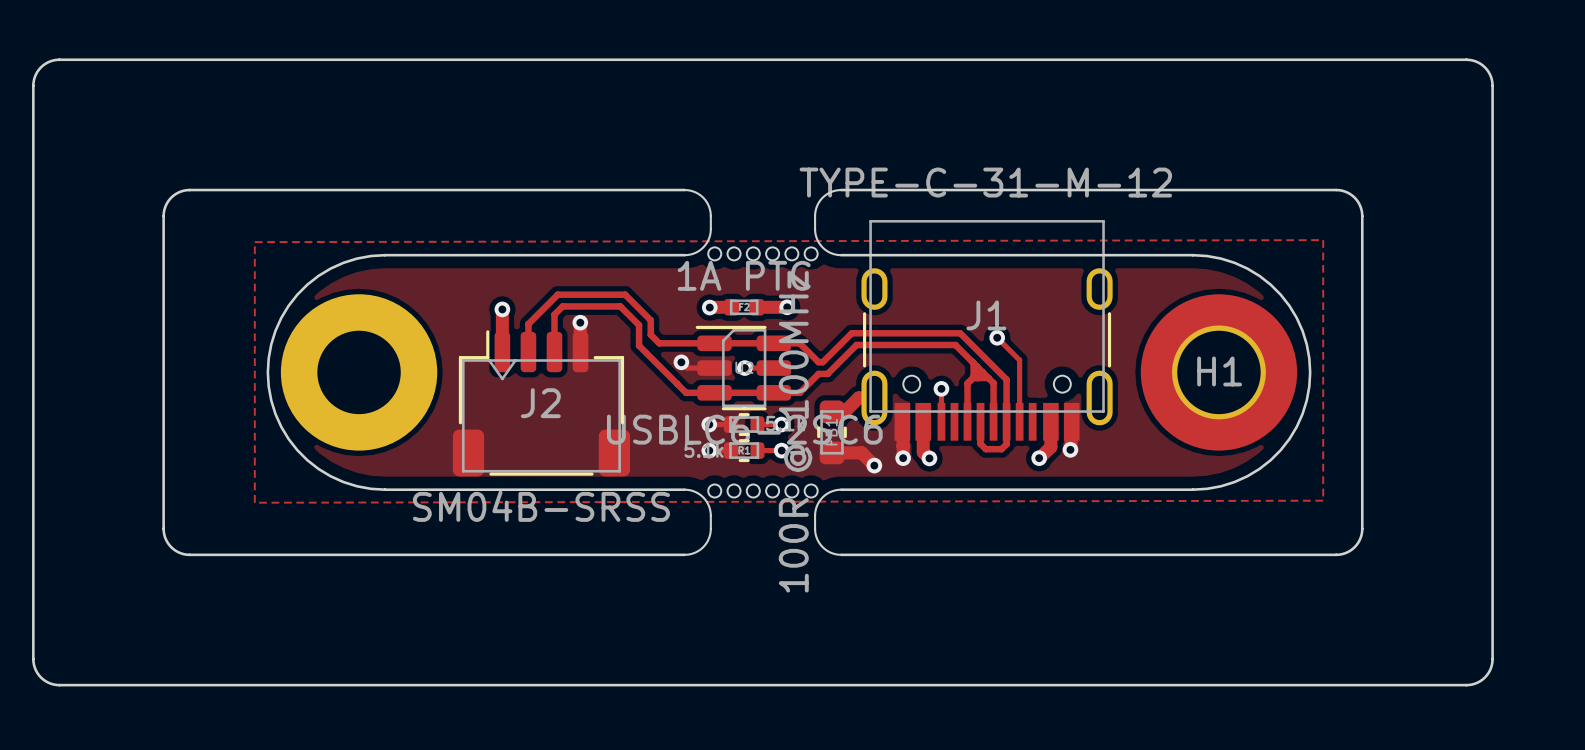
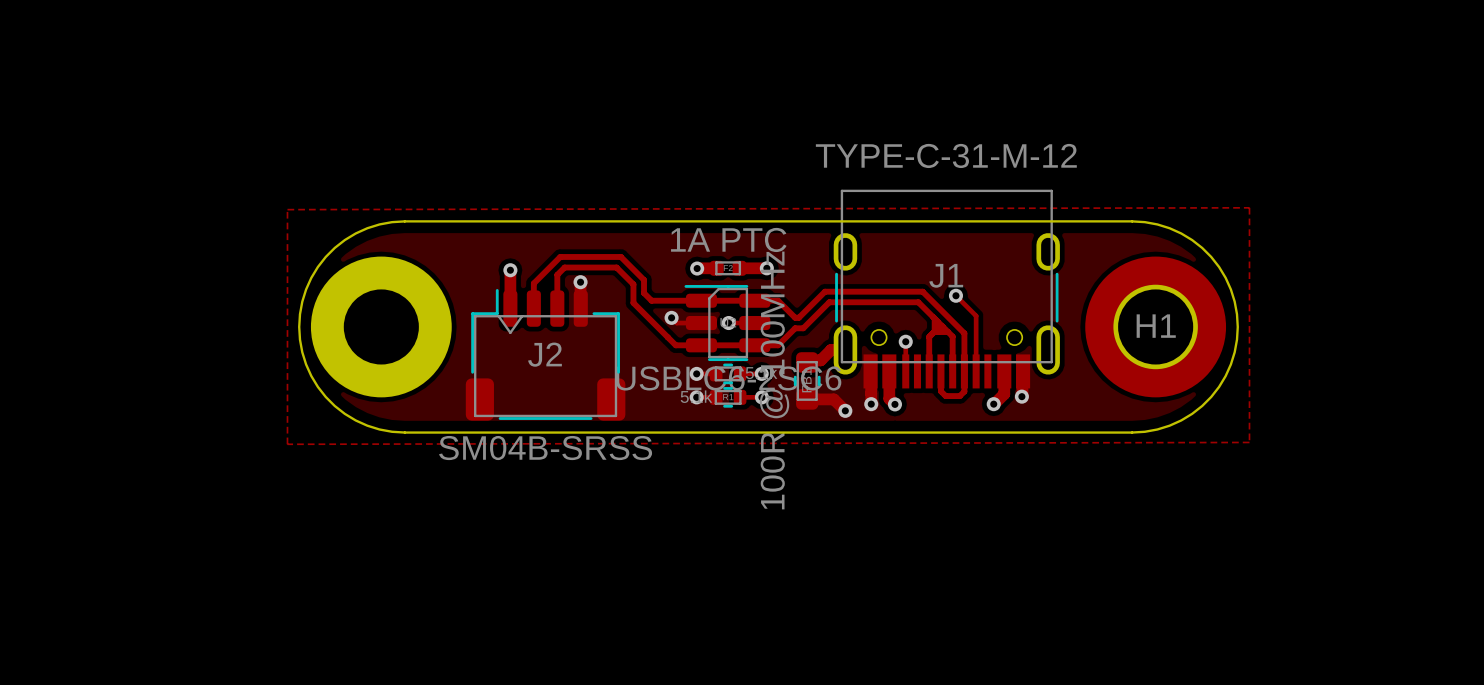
board edge: (59, 59) (1466, 59) (1477, 62) (1488, 71) (1492, 85) (1492, 659) (1489, 670) (1480, 681) (1466, 685) (59, 685) (48, 682) (37, 672) (33, 659) (33, 85) (35, 74) (40, 67) (50, 61) (59, 59) -> none
board edge: (684, 190) (189, 190) (175, 194) (167, 202) (163, 216) (163, 528) (166, 540) (171, 547) (178, 552) (189, 554) (684, 554) -> none
board edge: (841, 190) (1336, 190) (1344, 191) (1354, 197) (1360, 207) (1362, 216) (1362, 528) (1359, 540) (1350, 550) (1336, 554) (841, 554) -> none
part: (762, 224) -> none
board edge: none -> (674, 221) (815, 221)
board edge: none -> (674, 432) (815, 432)
part: (762, 520) -> none

